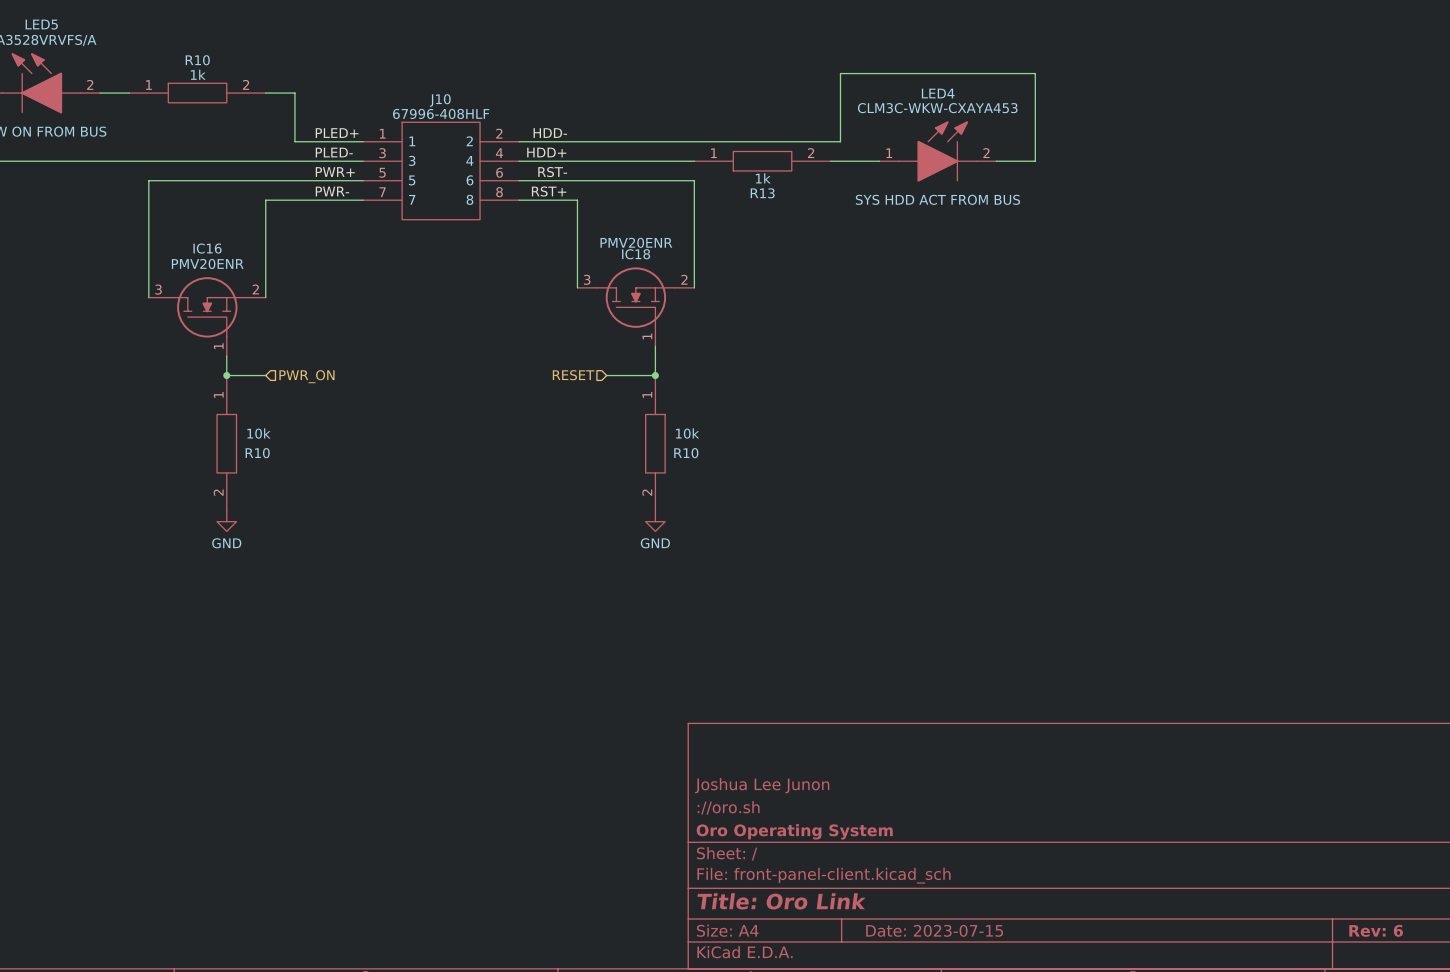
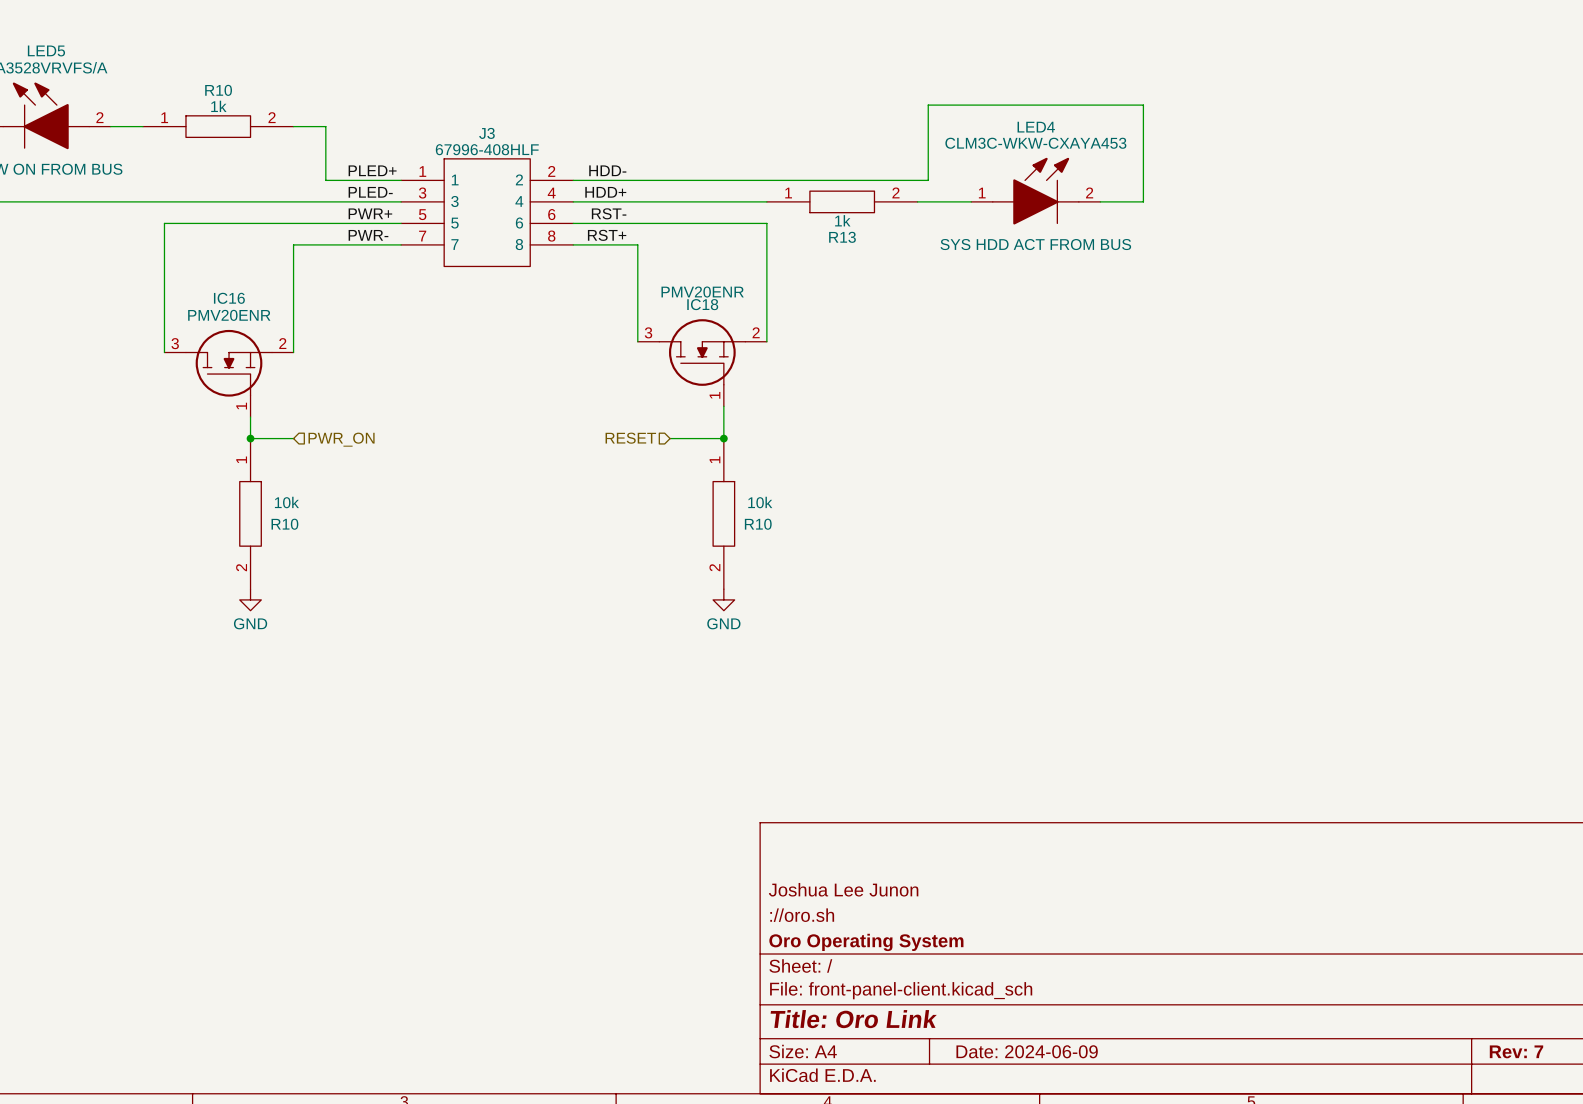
J10 name: J10 (440, 100) -> J3 (486, 133)
title block: Date: 2023-07-15 (934, 930) -> Date: 2024-06-09 (1027, 1051)
title block: Rev: 6 (1376, 930) -> Rev: 7 (1516, 1051)

